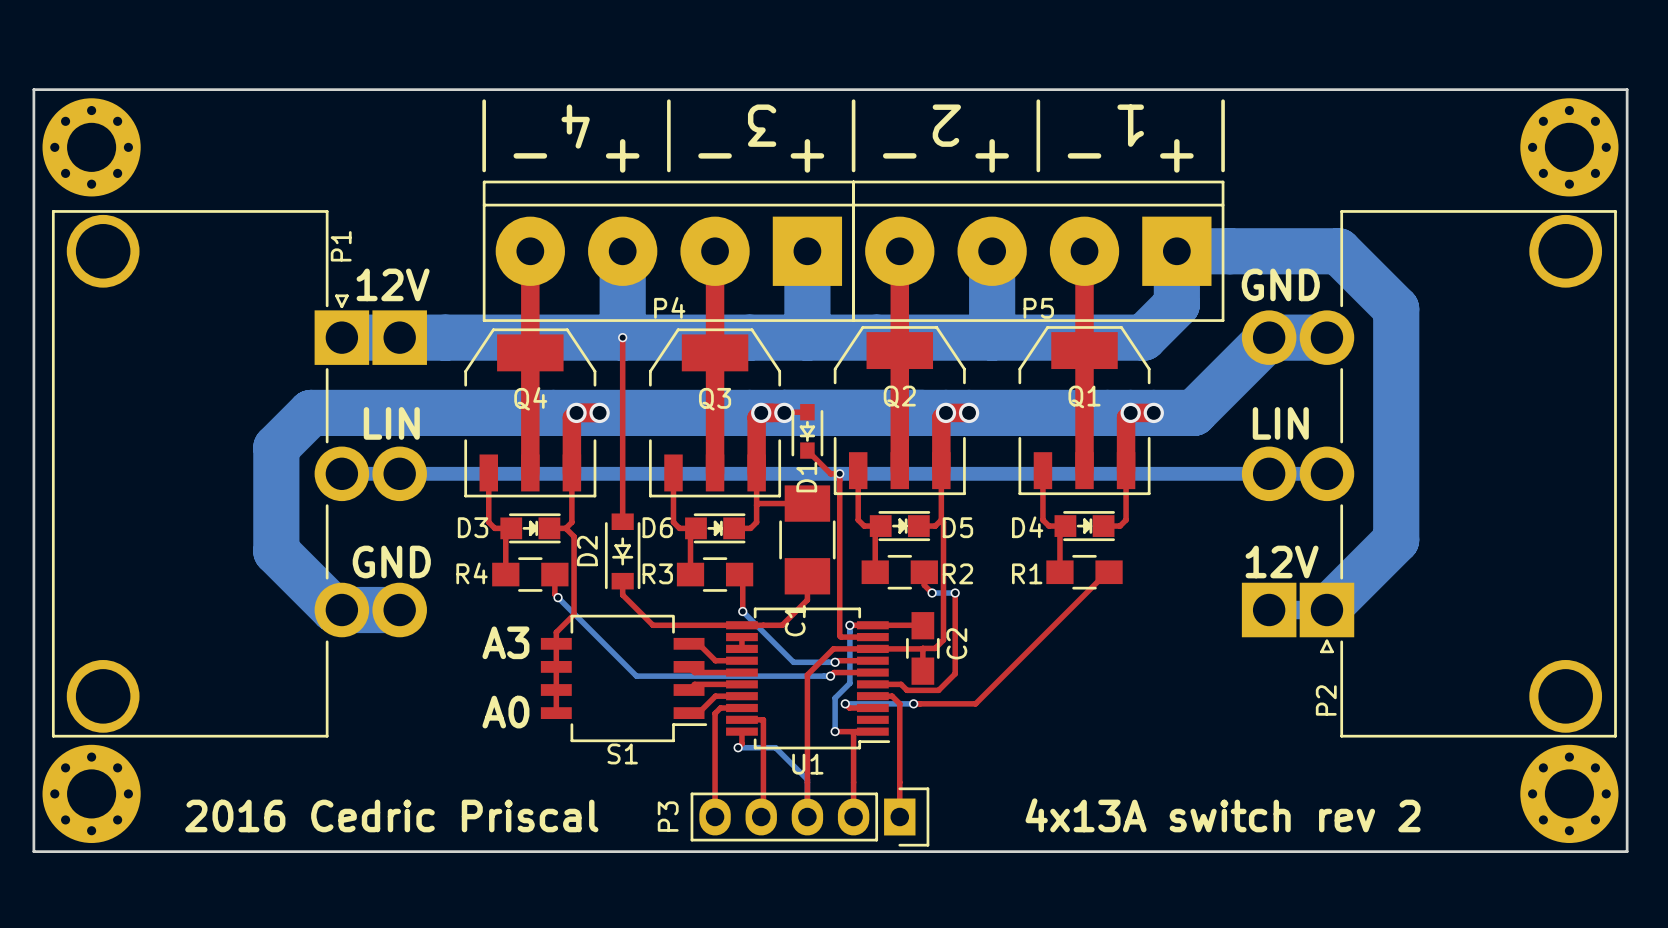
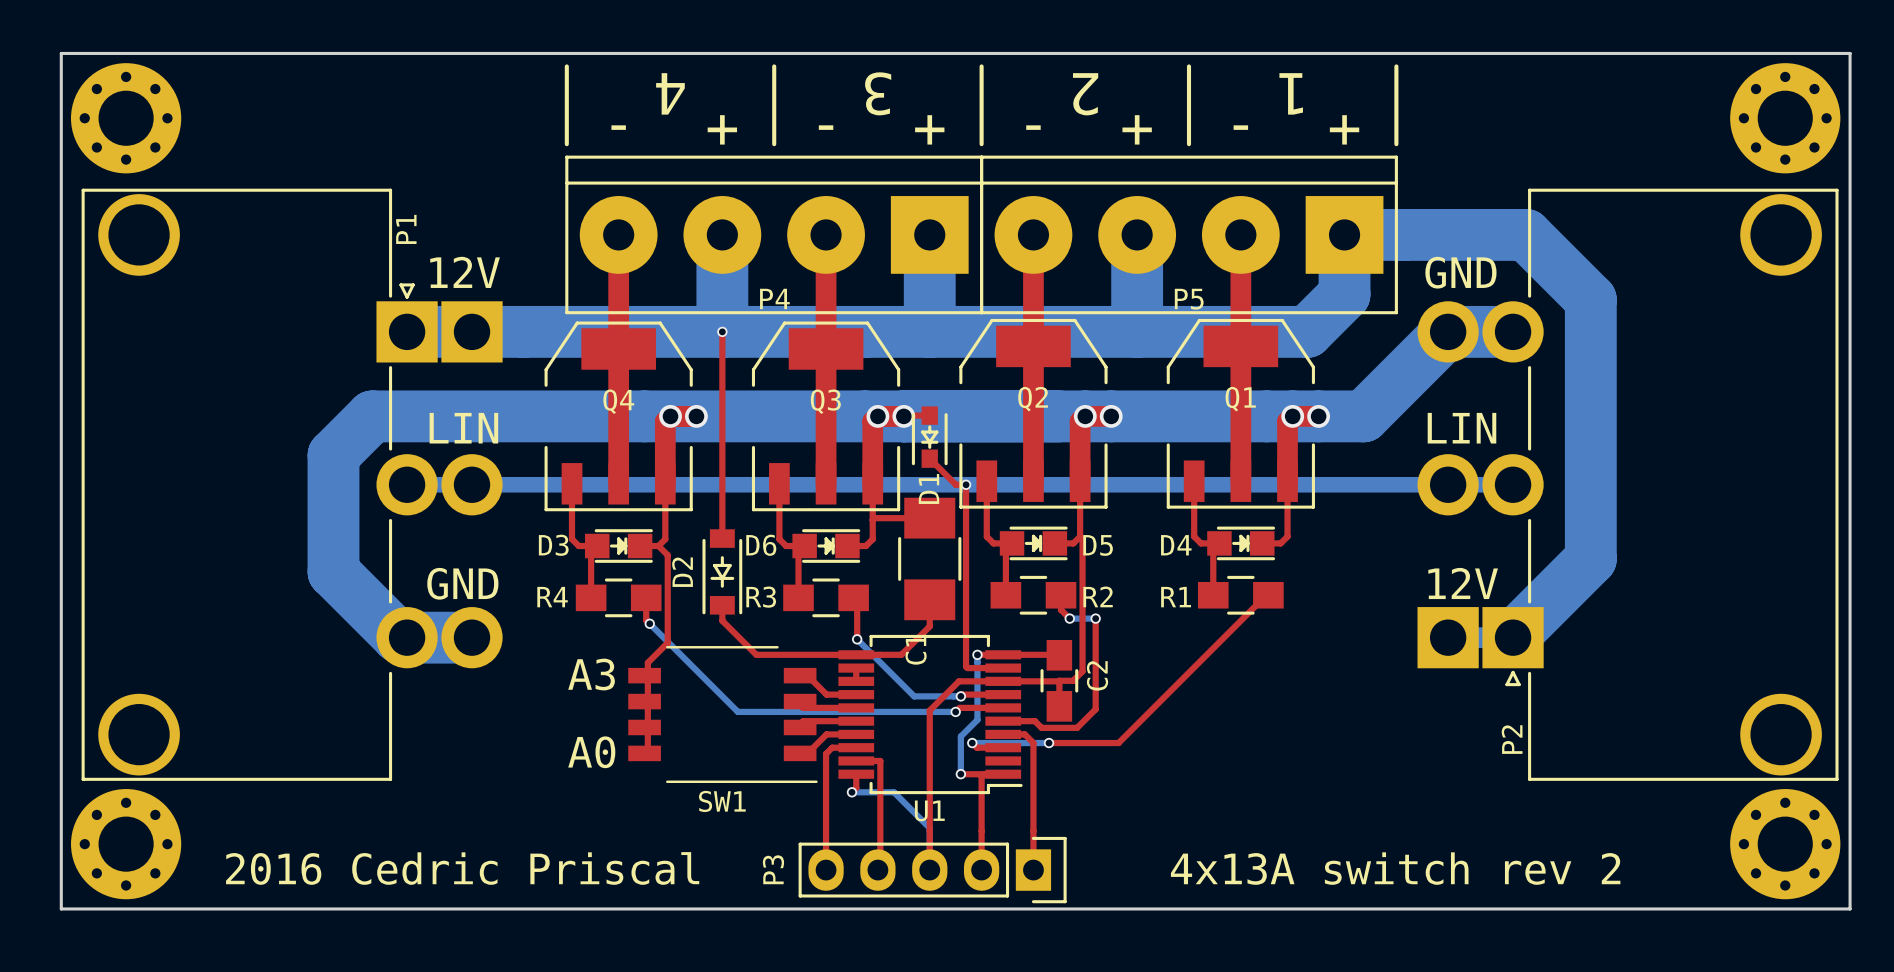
SW1: none -> (722, 714)
S1: (624, 678) -> none

